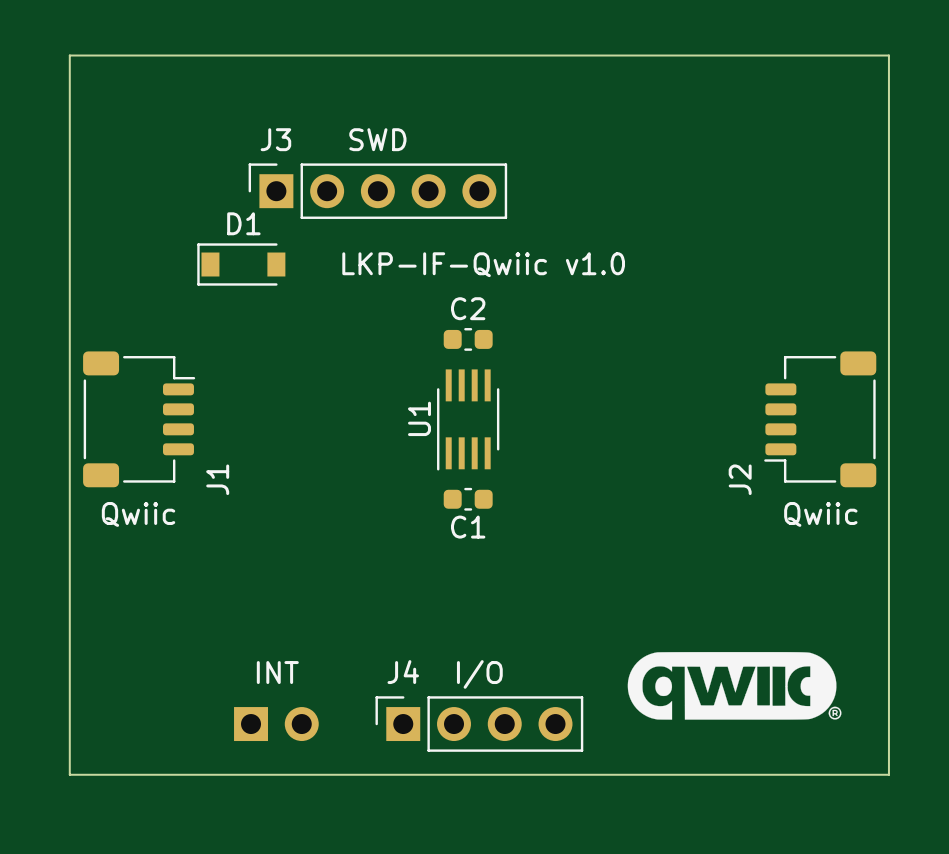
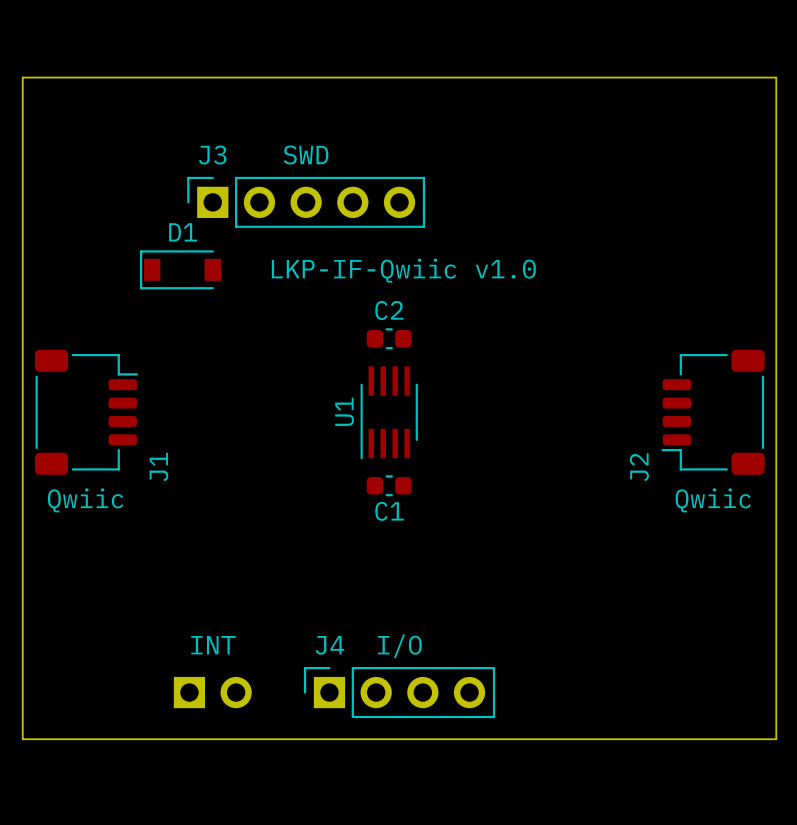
drawing: [627, 652, 842, 720] -> none

